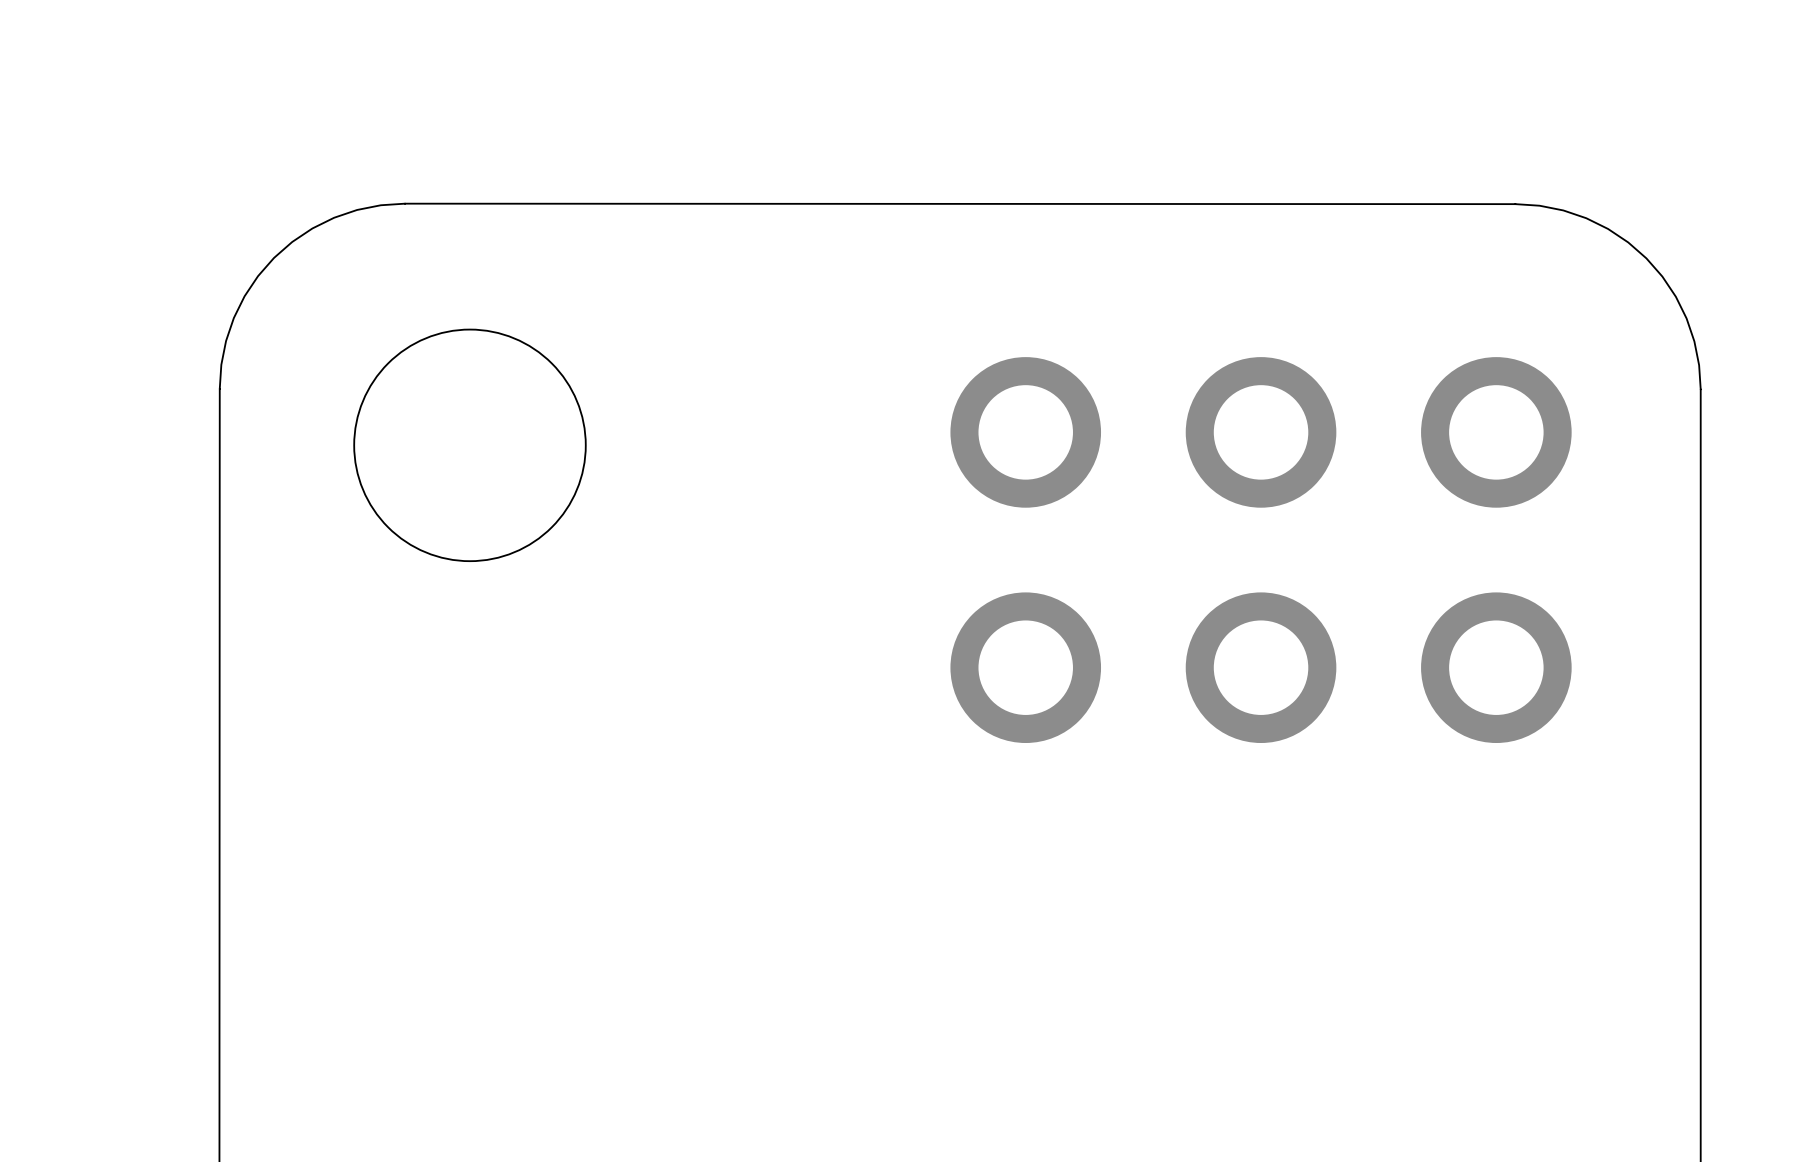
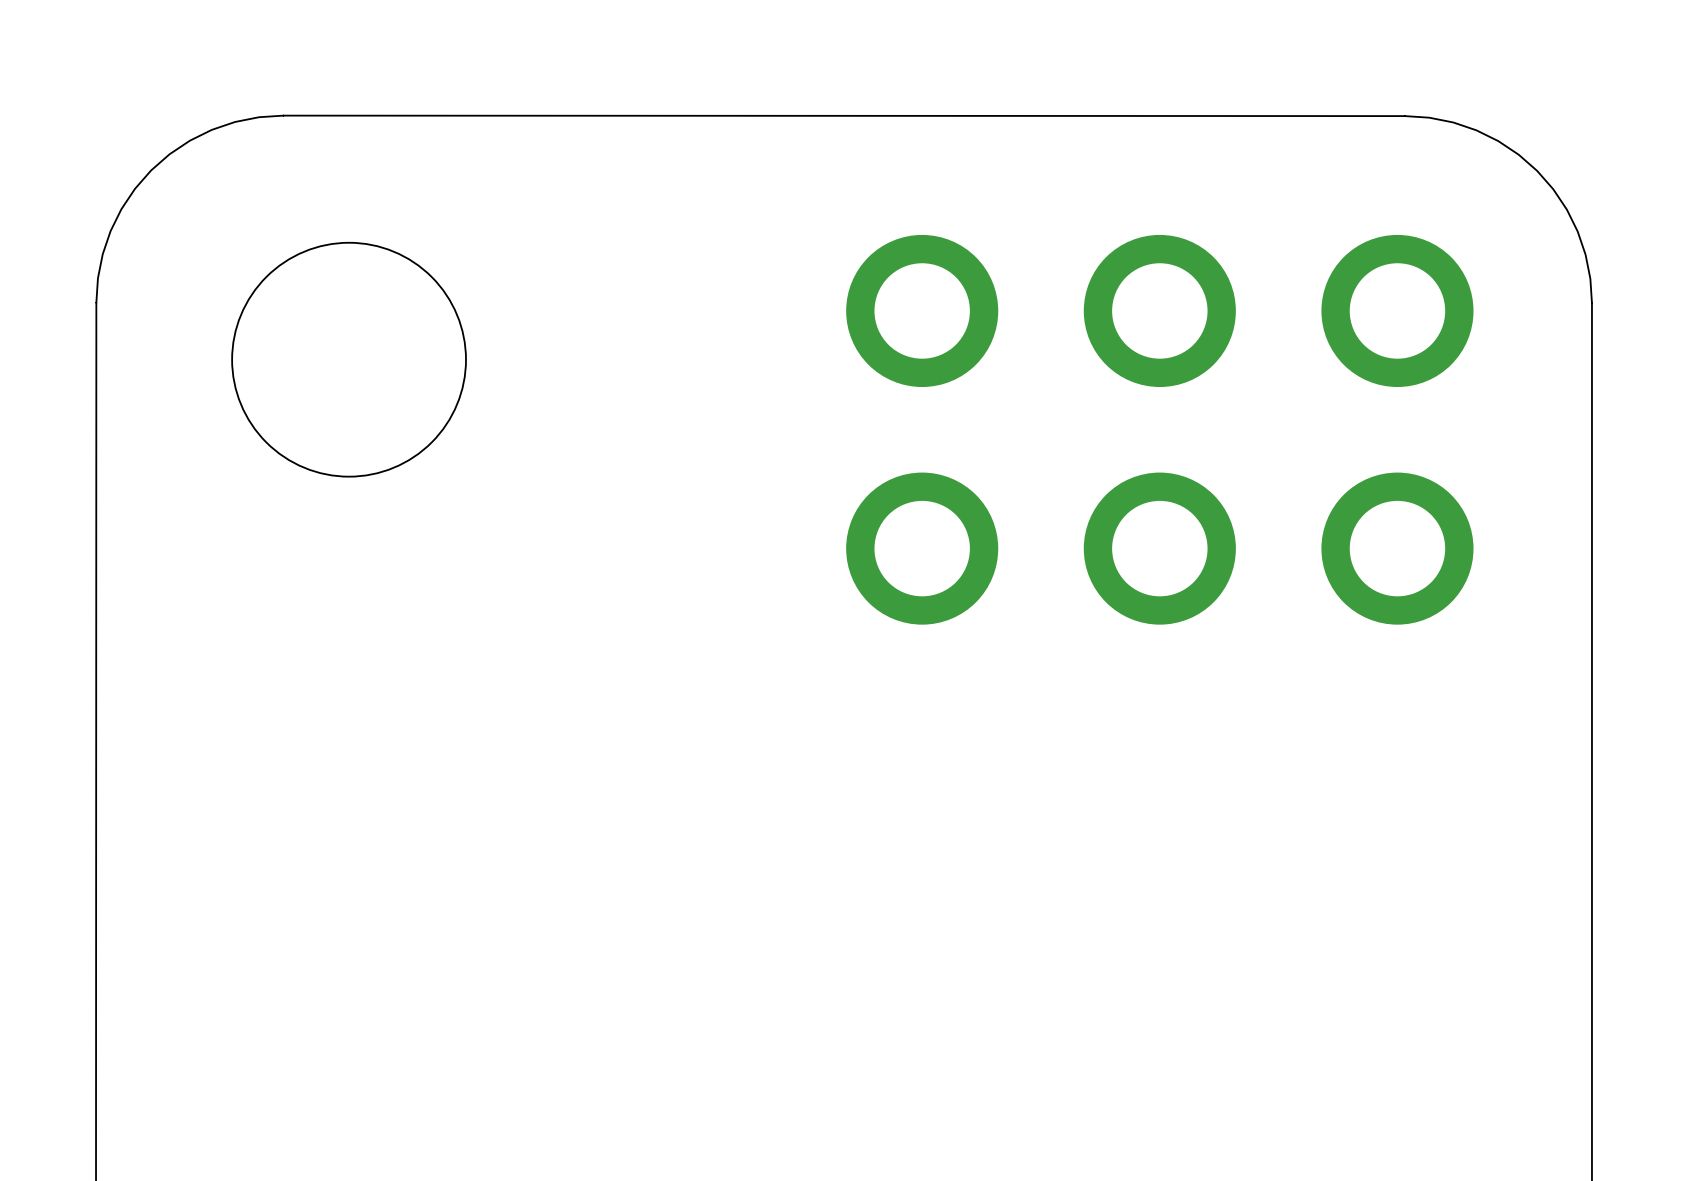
part position: (1261, 550) -> (1159, 429)

